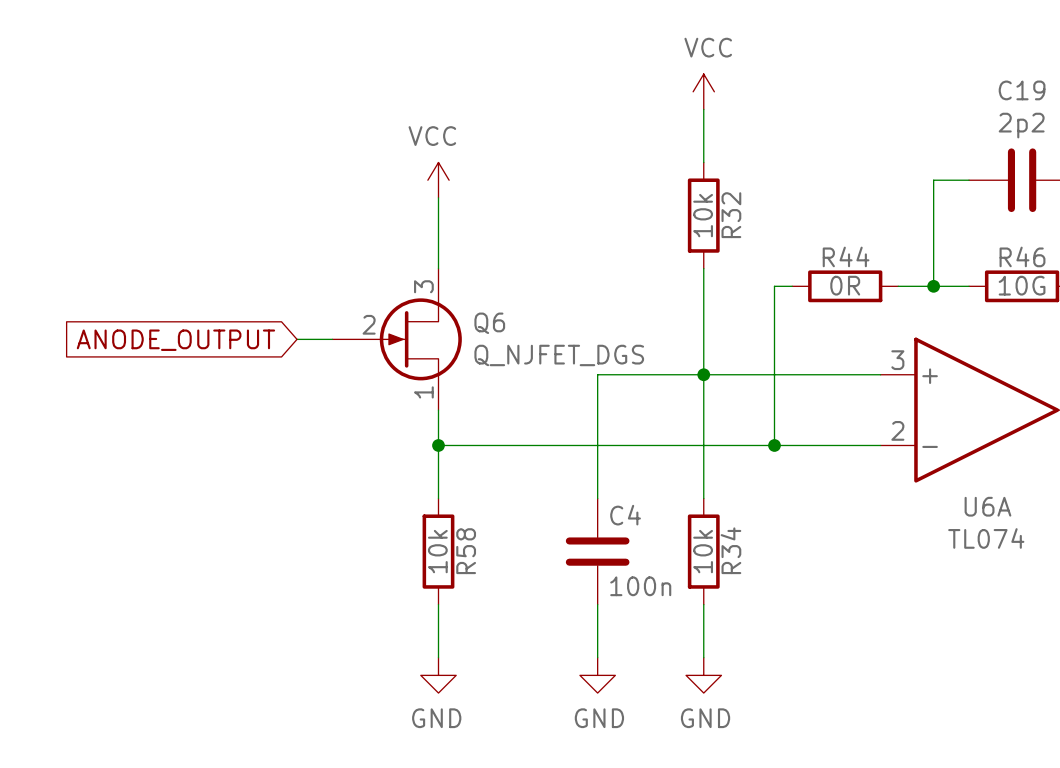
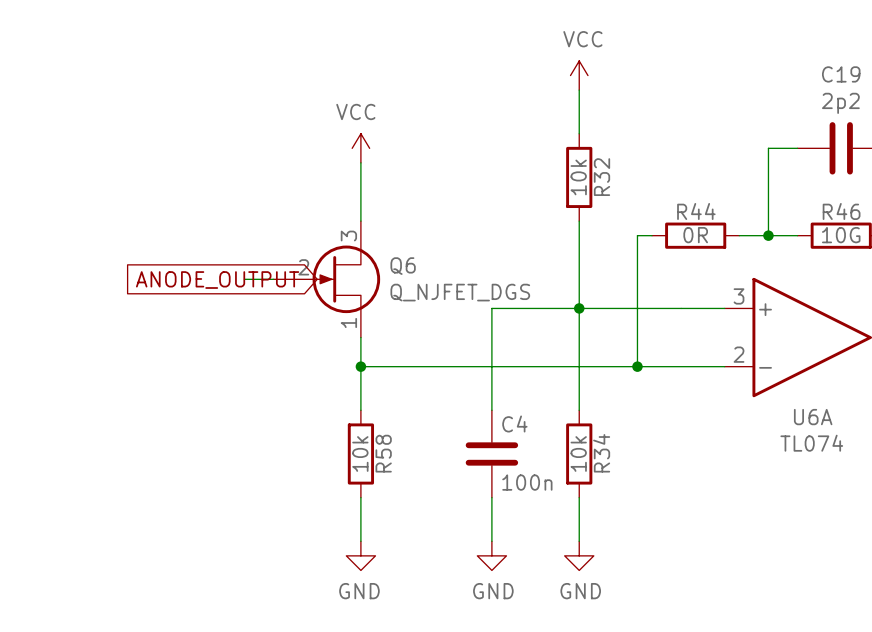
global label position: ANODE_OUTPUT (175, 340) -> ANODE_OUTPUT (217, 280)

